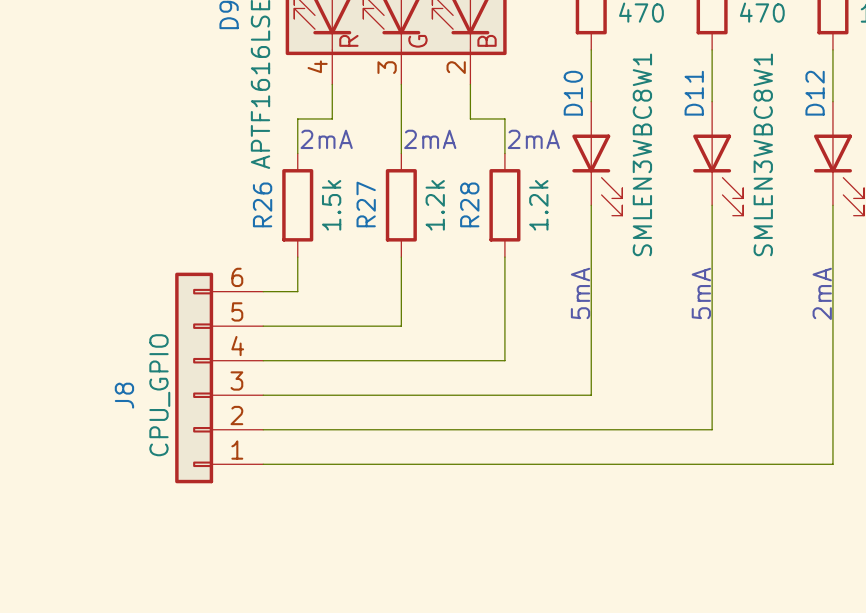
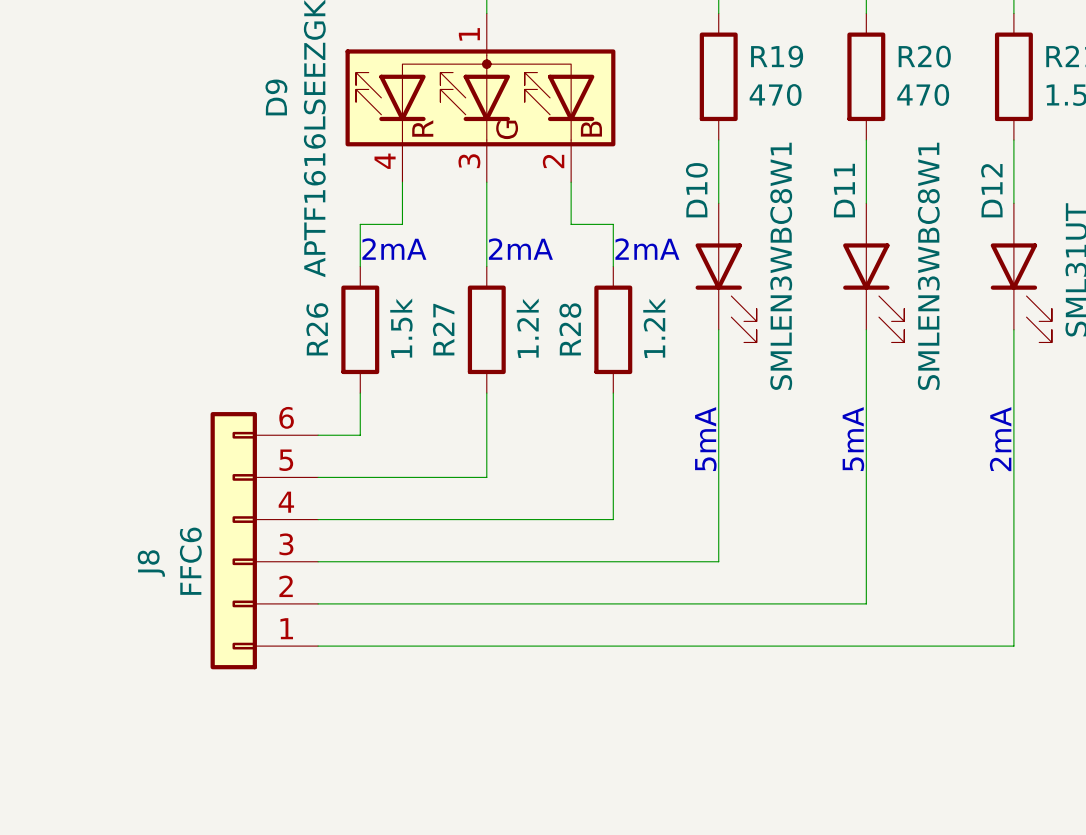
J8 value: CPU_GPIO (159, 395) -> FFC6 (190, 561)

